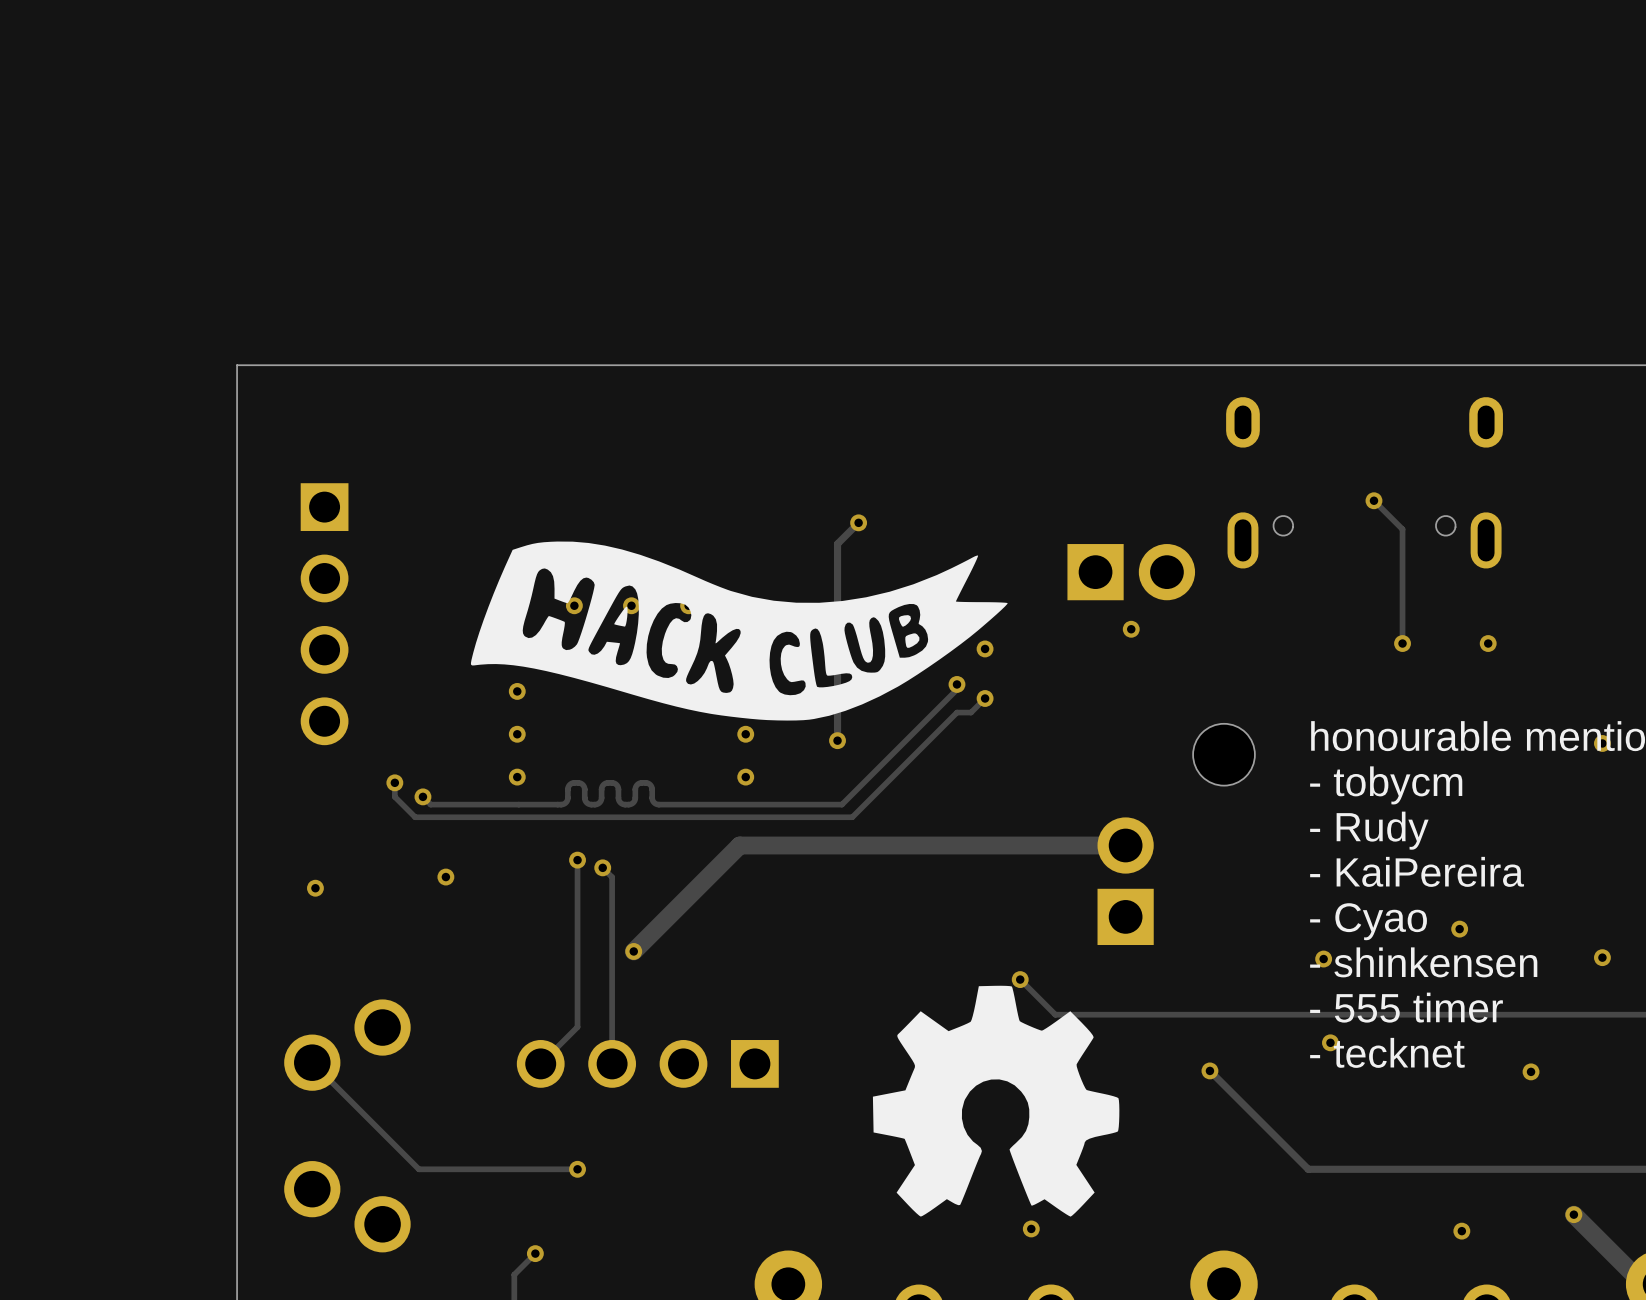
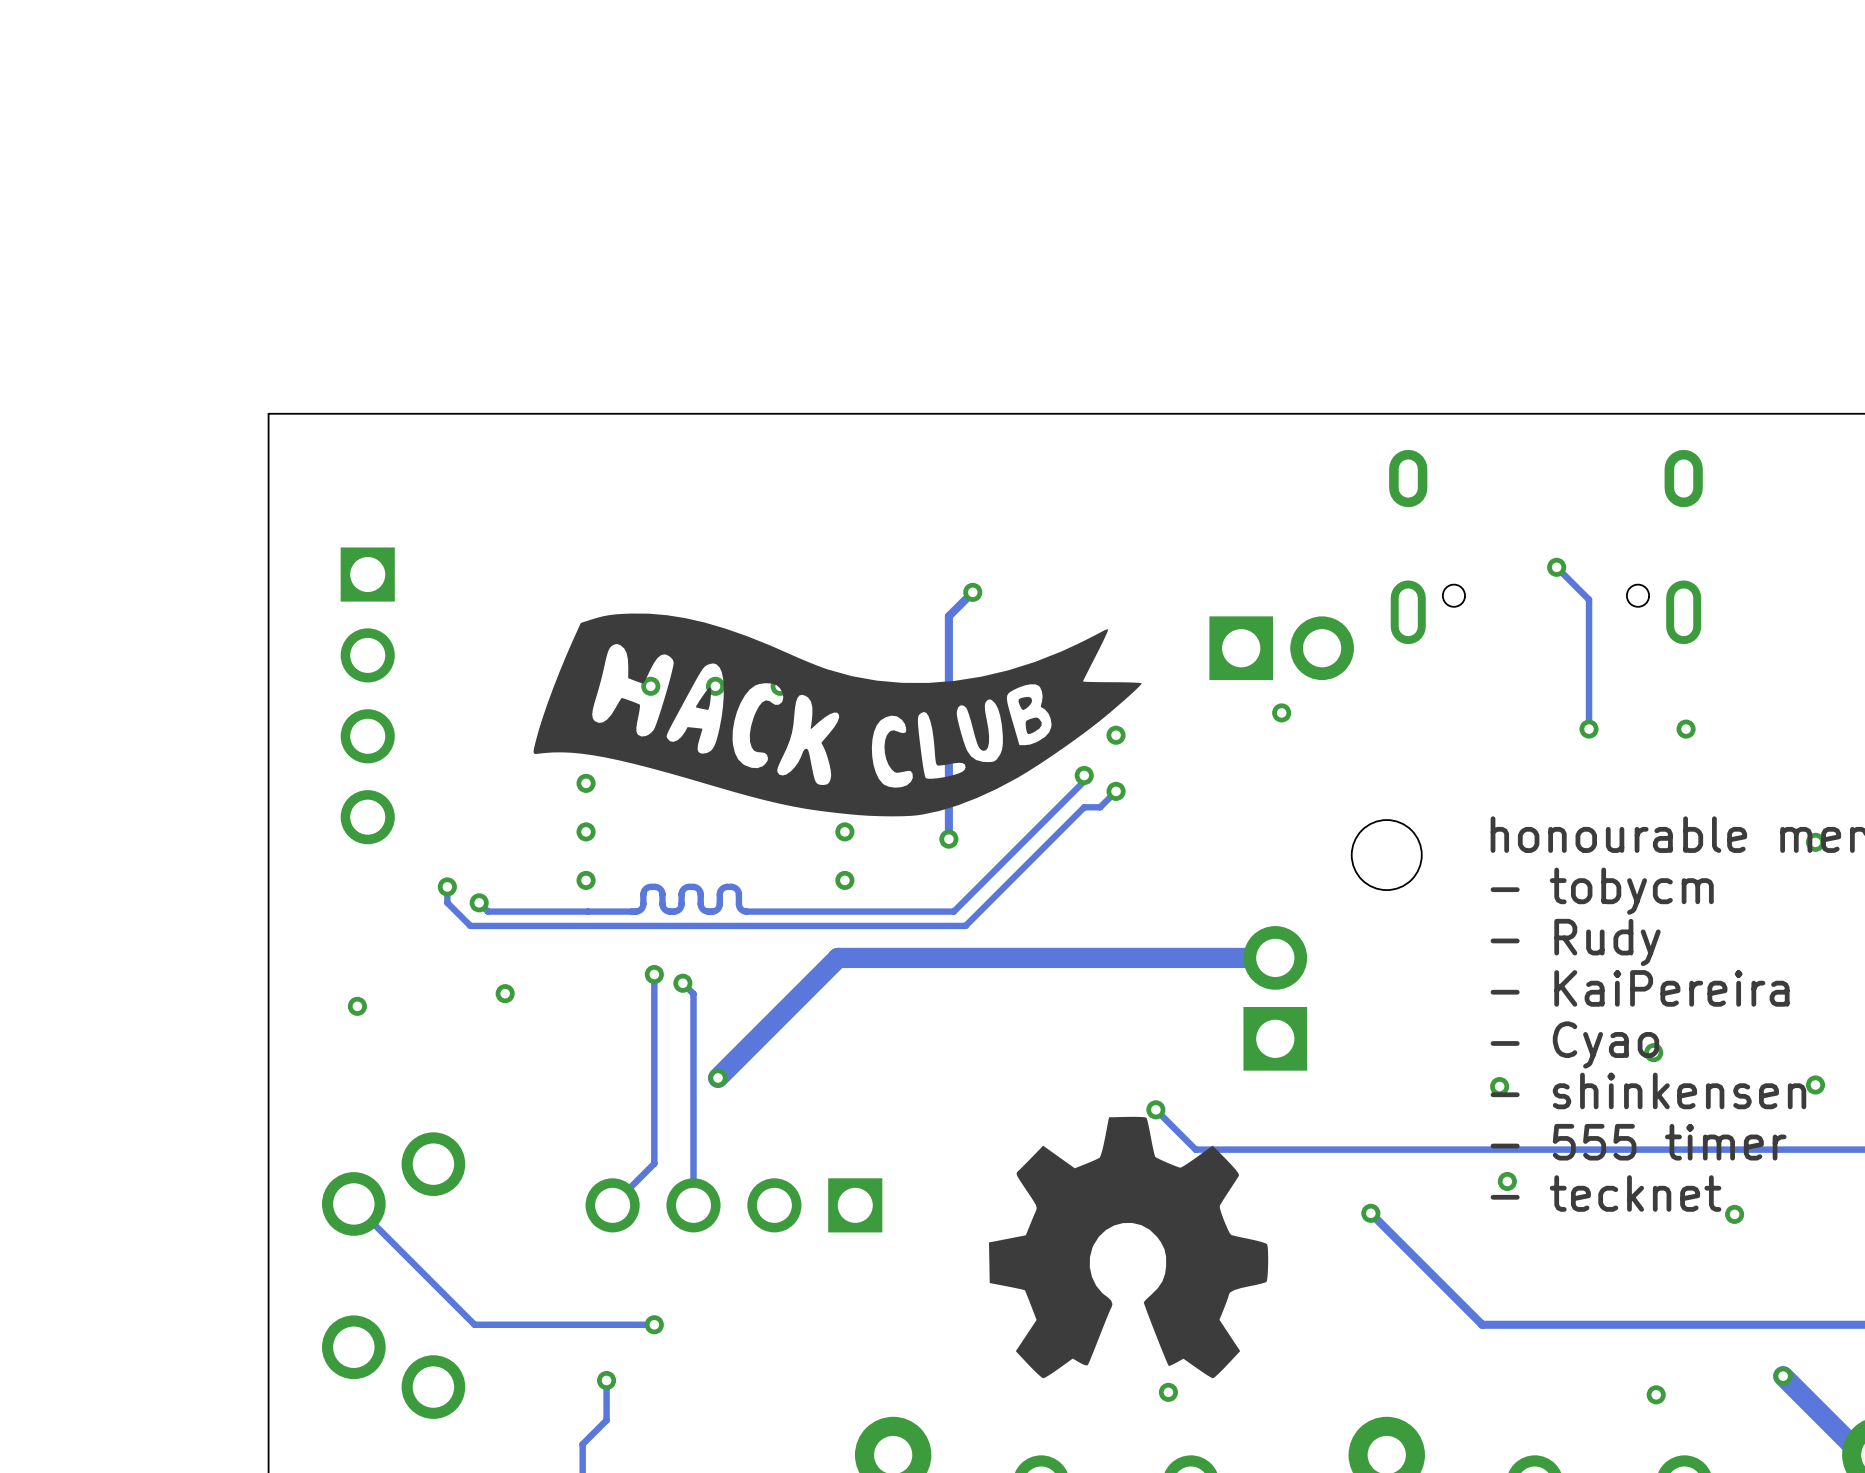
track: none -> (606, 1380) (606, 1420)
via position: (535, 1253) -> (606, 1380)

